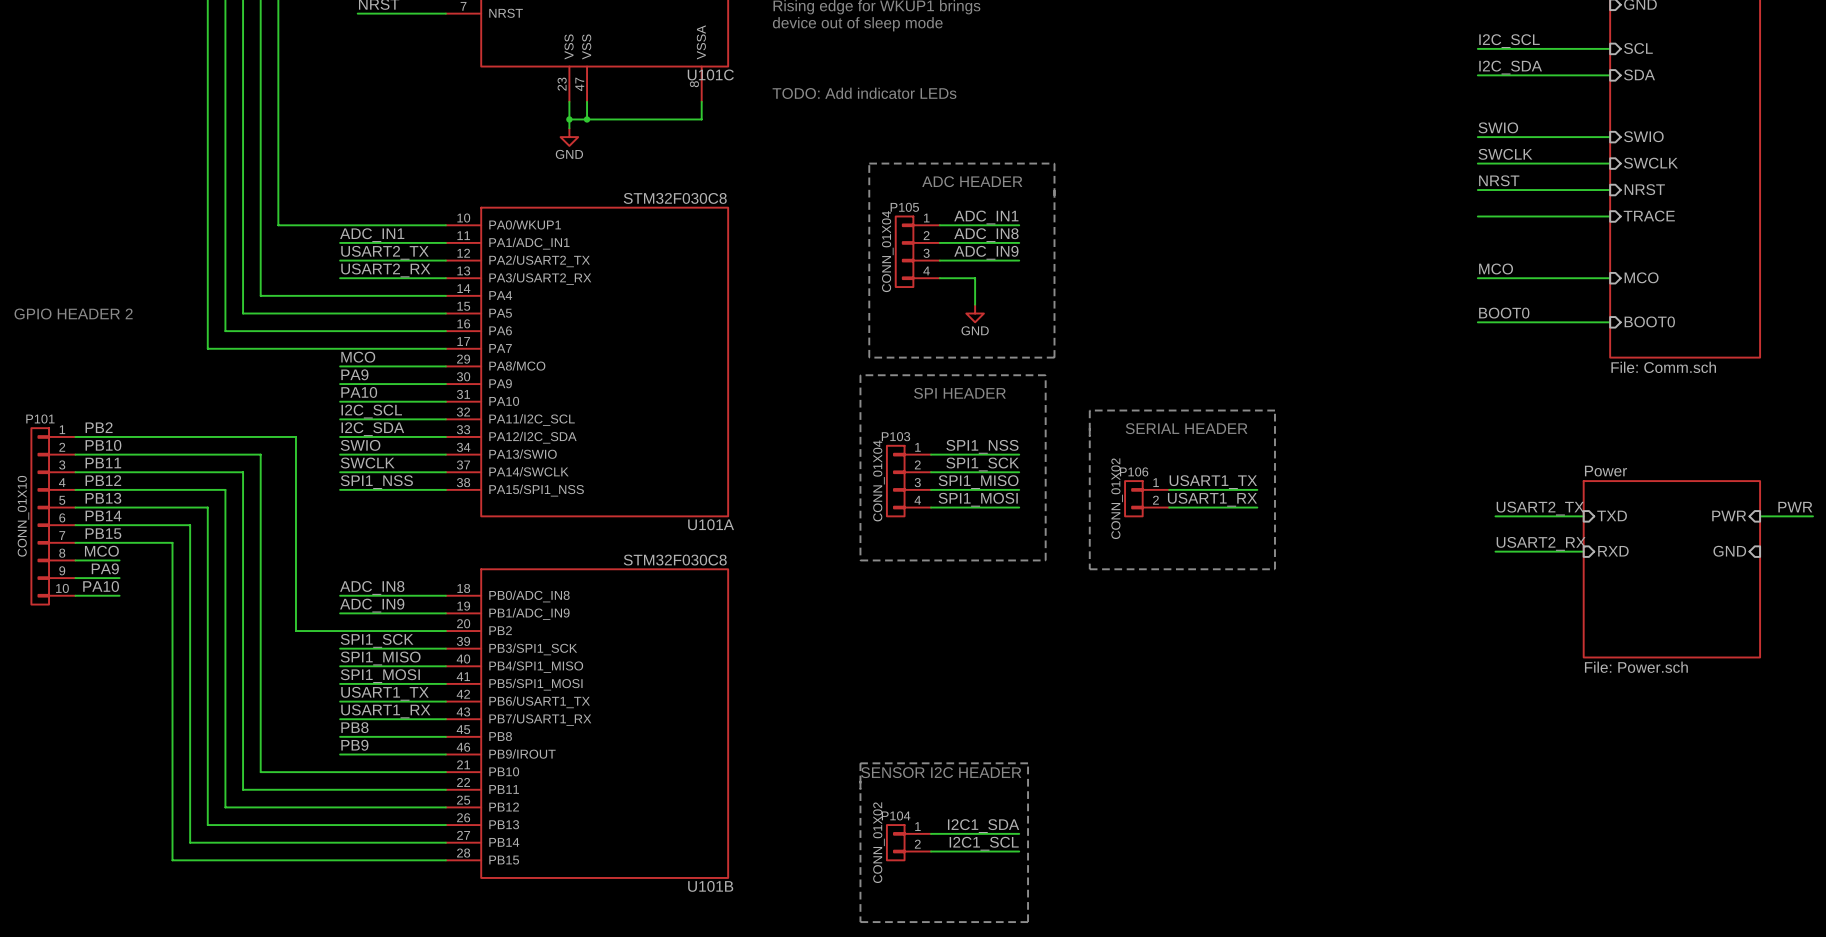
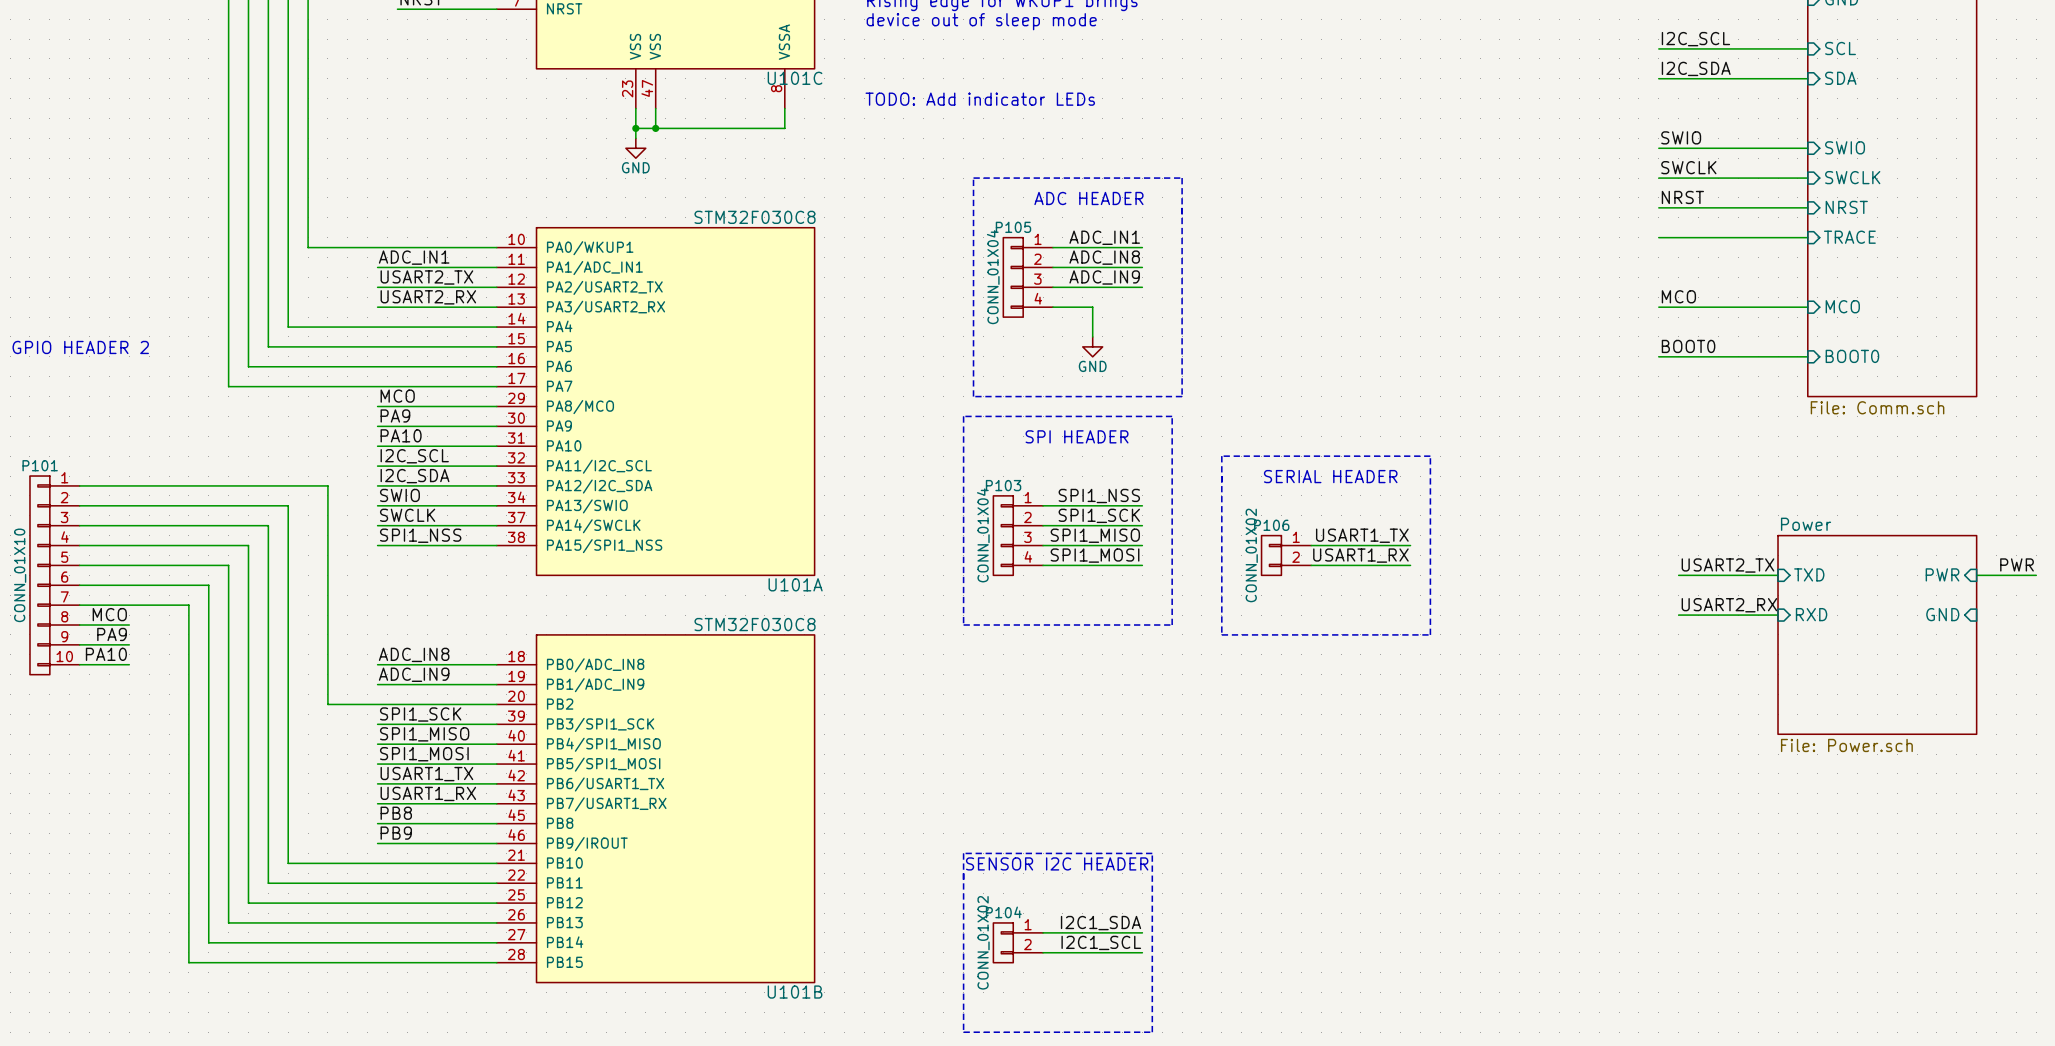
label: PB2 (99, 427) -> none
label: PB10 (103, 445) -> none
label: PB11 (103, 463) -> none
label: PB12 (103, 480) -> none
label: PB13 (103, 498) -> none
label: PB14 (103, 515) -> none
label: PB15 (103, 533) -> none

